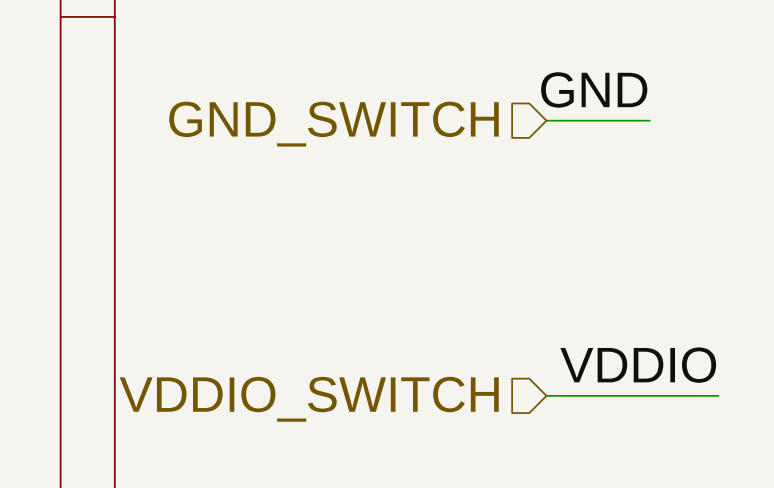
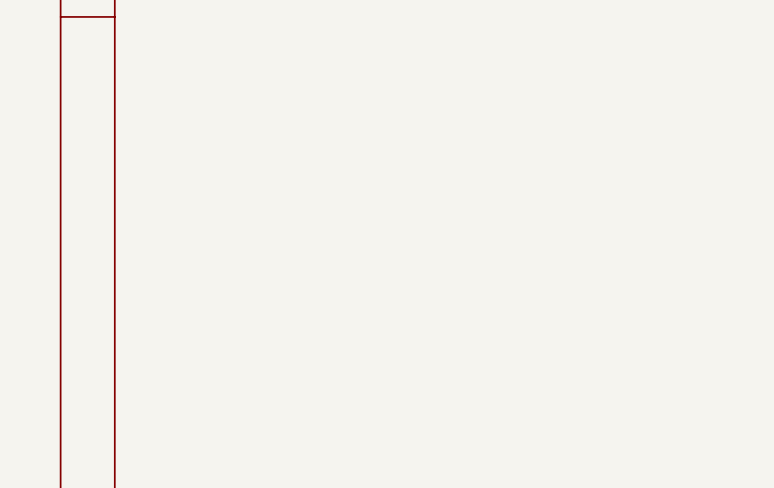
label: GND (594, 89) -> none
wire: (546, 120) (649, 120) -> none
hierarchical label: GND_SWITCH (334, 124) -> none
label: VDDIO (638, 365) -> none
wire: (546, 395) (718, 395) -> none
hierarchical label: VDDIO_SWITCH (309, 399) -> none

